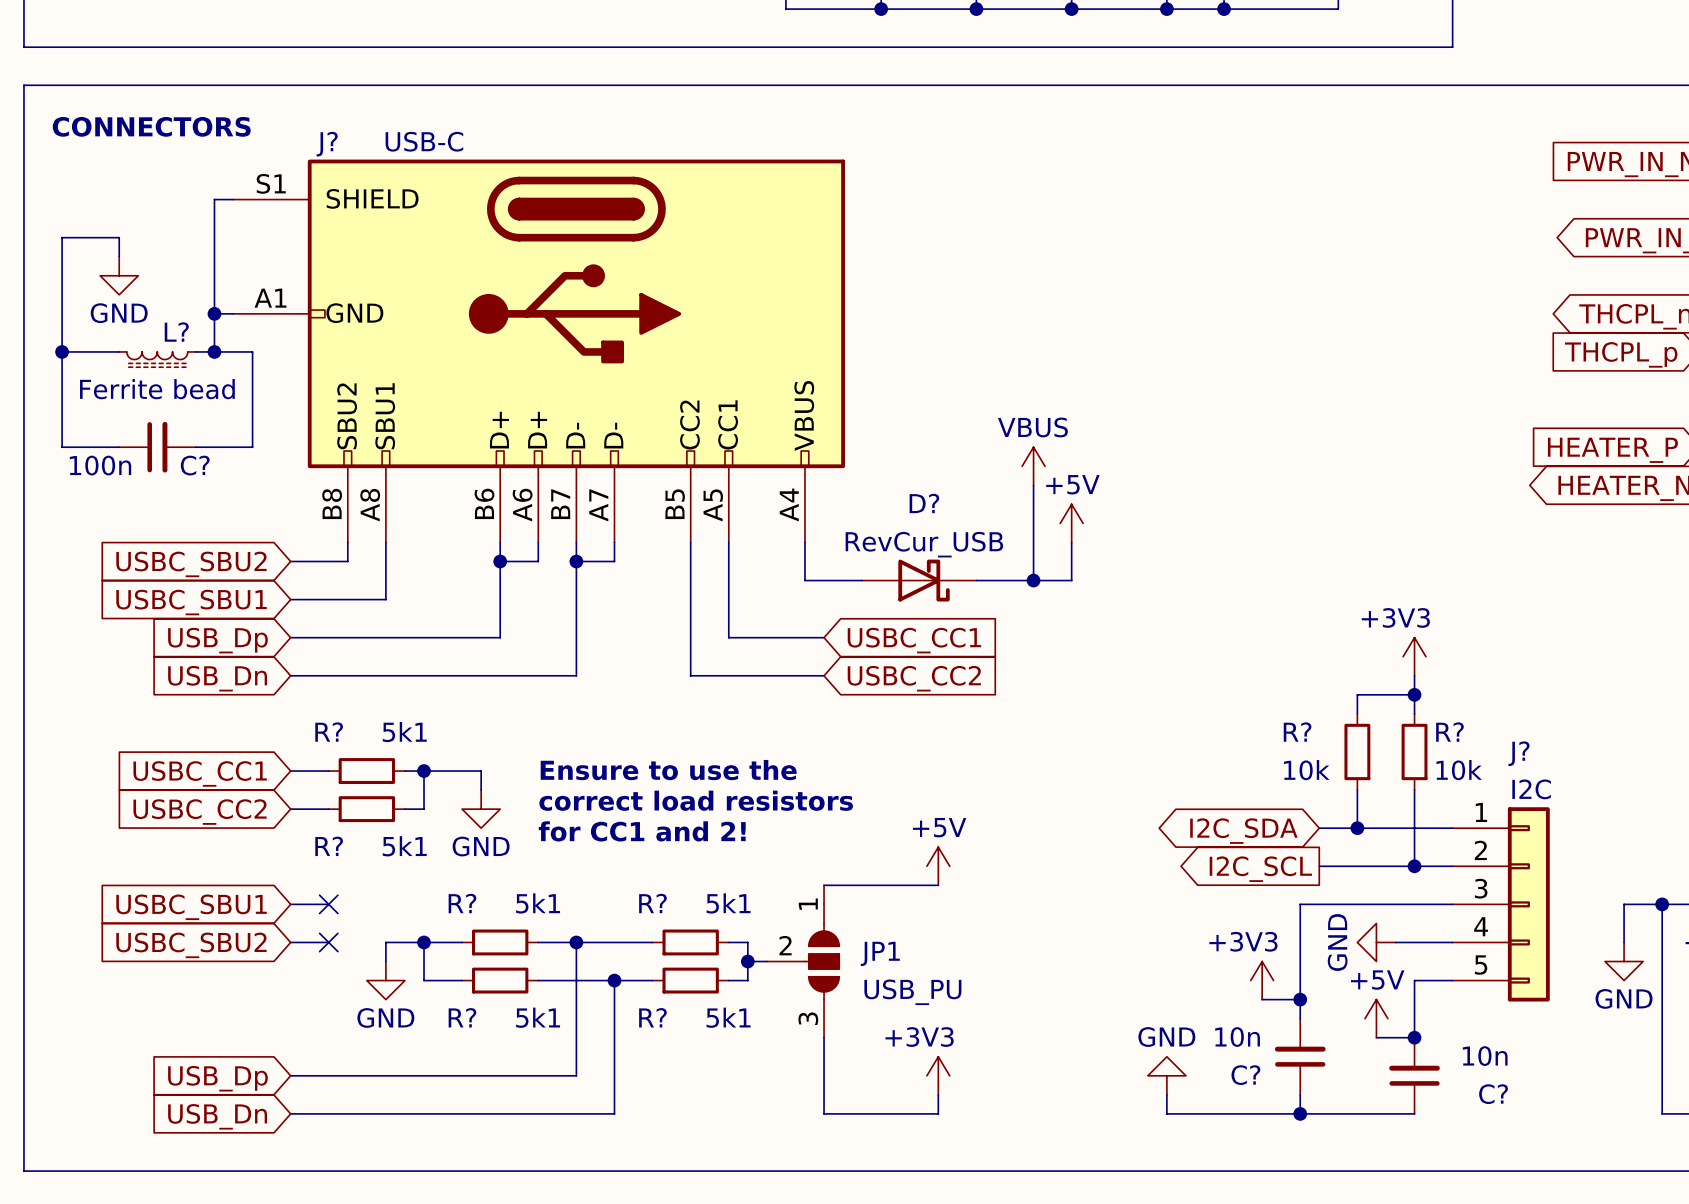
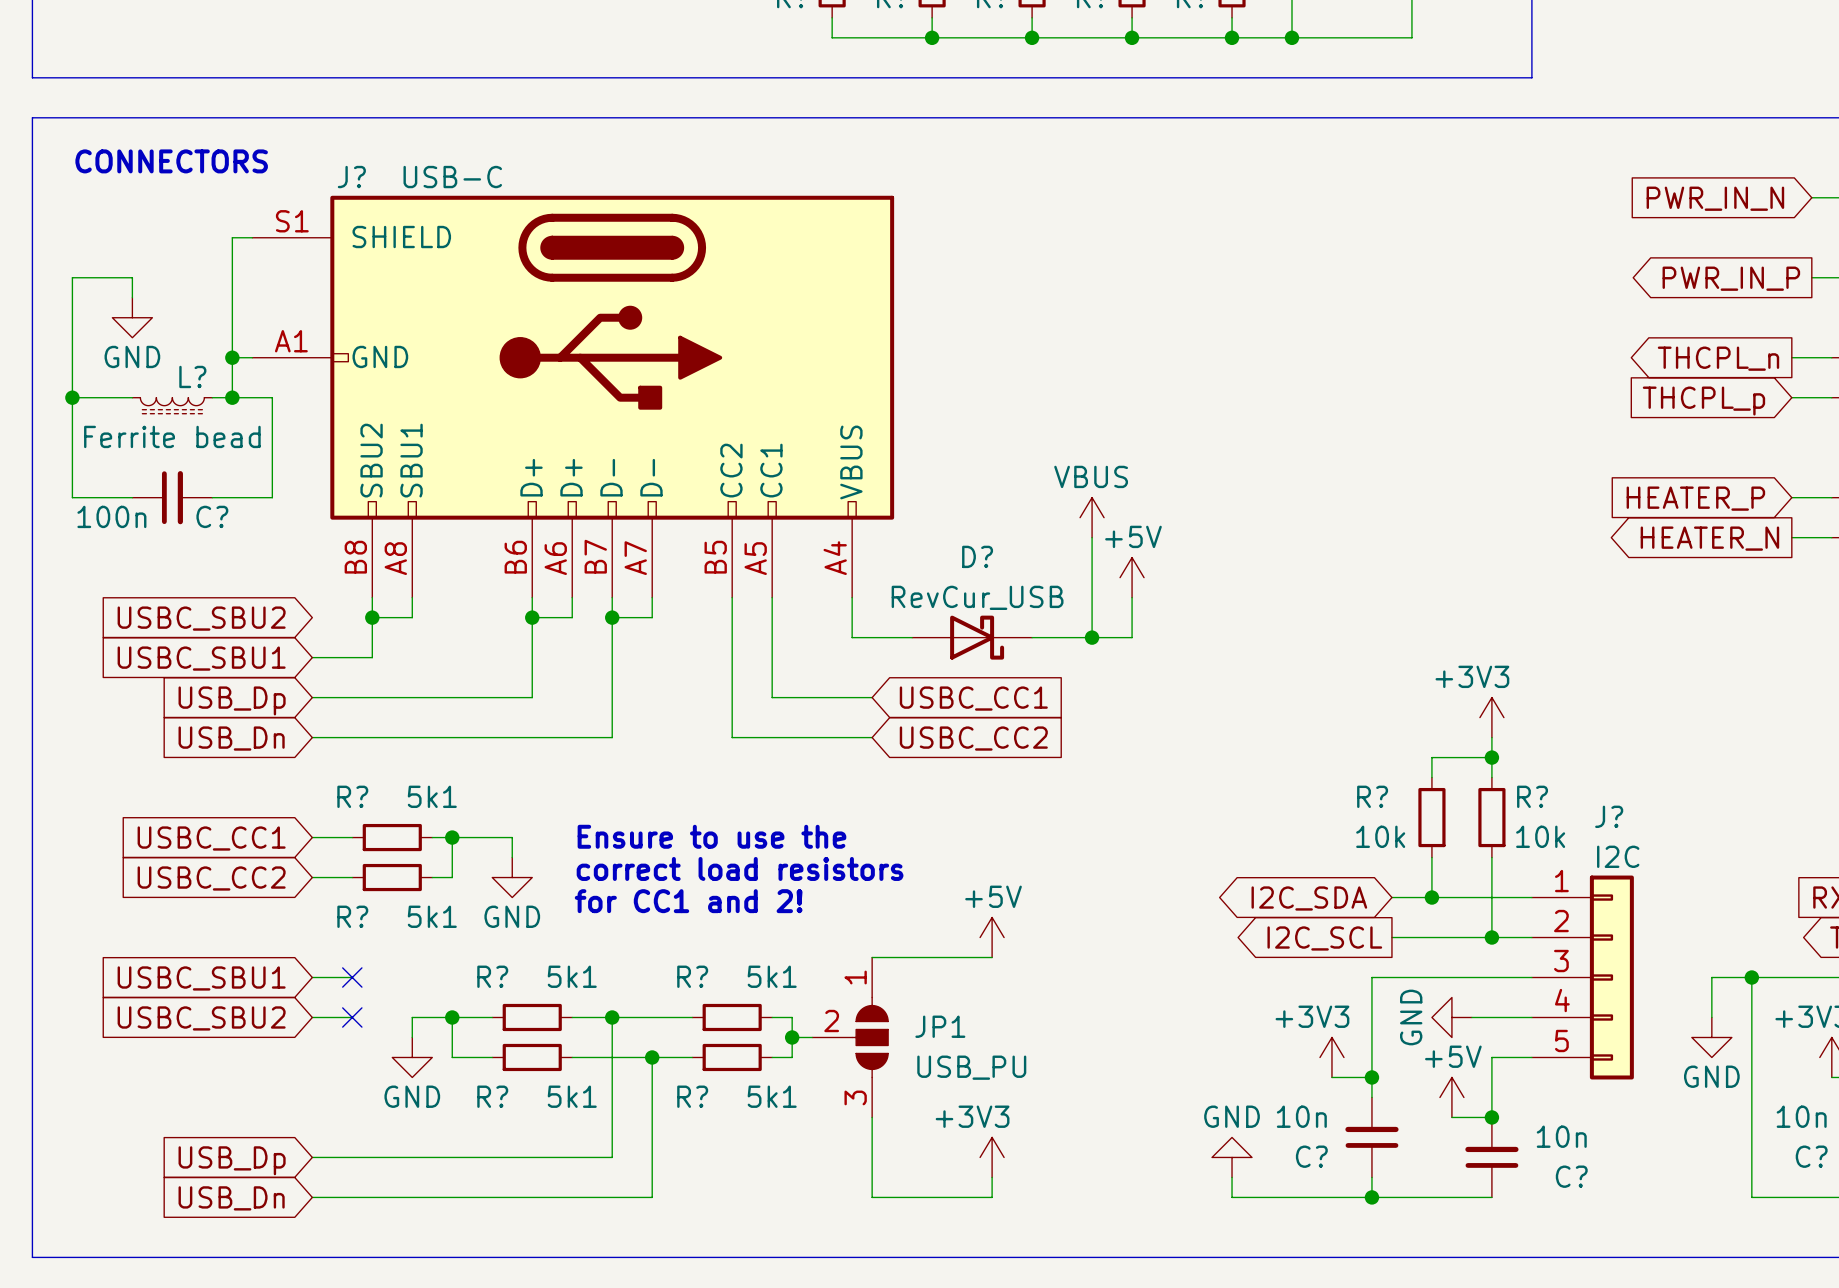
wire: (290, 561) (347, 561) -> none
junction: none -> (372, 617)
wire: (385, 561) (385, 599) (347, 599) -> (412, 617) (372, 617) (372, 657)

